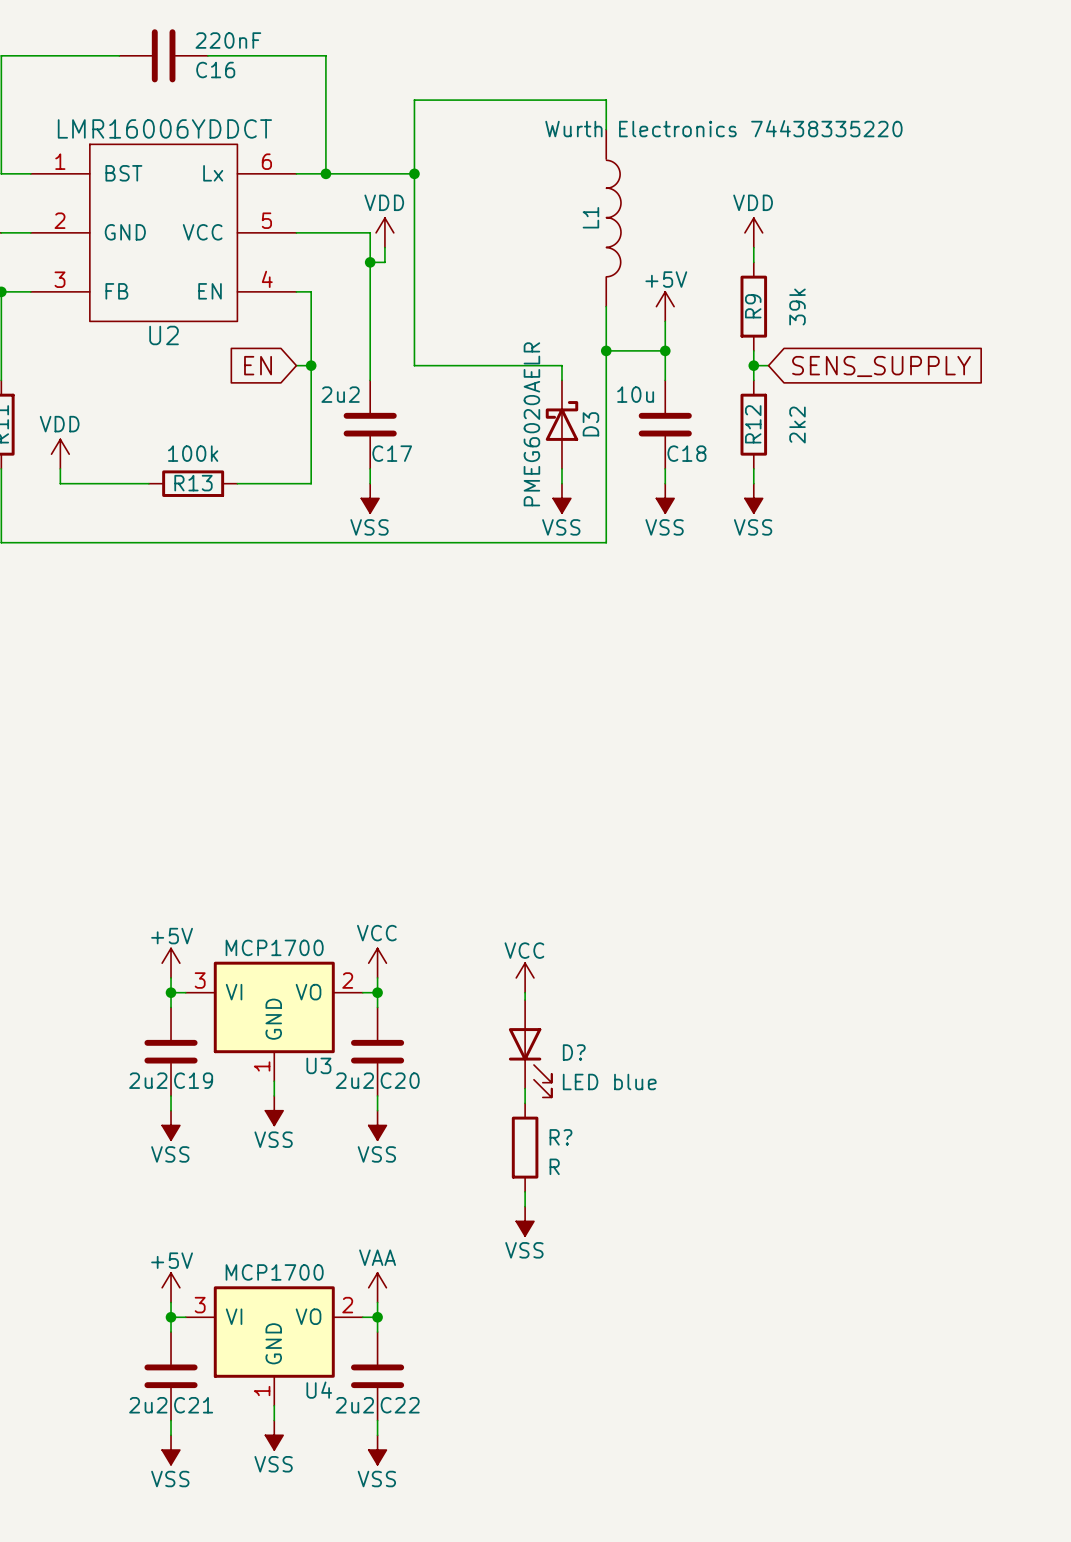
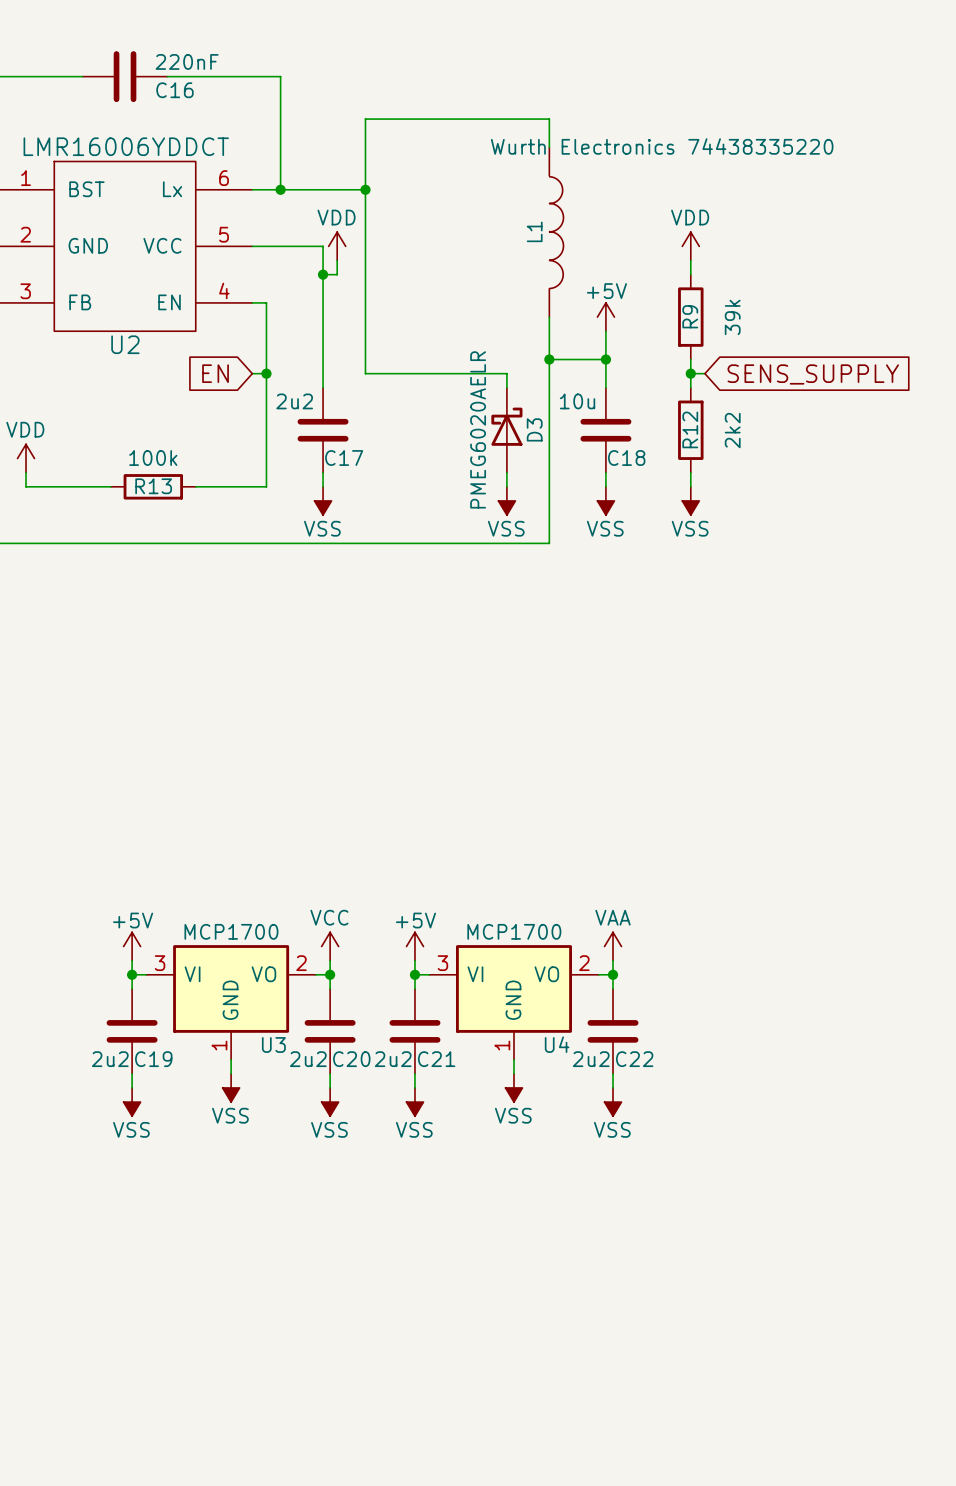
power symbol: none -> +5V (414, 946)
power symbol: none -> VAA (613, 946)
wire: none -> (414, 960) (414, 988)
power symbol: VCC (525, 977) -> none
wire: none -> (613, 960) (613, 988)
wire: none -> (414, 974) (429, 974)
junction: none -> (414, 974)
wire: none -> (598, 974) (613, 974)
junction: none -> (613, 974)
D?: LED blue (530, 1048) -> none
wire: (525, 1088) (525, 1103) -> (513, 1059) (513, 1073)
wire: none -> (613, 1073) (613, 1087)
power symbol: none -> VSS (513, 1087)
power symbol: none -> VSS (414, 1102)
power symbol: none -> VSS (613, 1102)
R?: R (525, 1147) -> none
wire: (525, 1191) (525, 1206) -> (414, 1073) (414, 1087)
power symbol: VSS (525, 1221) -> none
power symbol: +5V (171, 1287) -> none
power symbol: VAA (377, 1287) -> none
wire: (171, 1302) (171, 1332) -> none
wire: (377, 1302) (377, 1332) -> none
wire: (171, 1317) (185, 1317) -> none
junction: (171, 1317) -> none
wire: (362, 1317) (377, 1317) -> none
junction: (377, 1317) -> none
U4 position: (274, 1346) -> (513, 1002)
C21 position: (171, 1376) -> (414, 1031)
C22 position: (377, 1376) -> (613, 1031)
wire: (274, 1405) (274, 1420) -> none
wire: (171, 1420) (171, 1435) -> none
wire: (377, 1420) (377, 1435) -> none
power symbol: VSS (274, 1435) -> none
power symbol: VSS (171, 1450) -> none
power symbol: VSS (377, 1450) -> none

